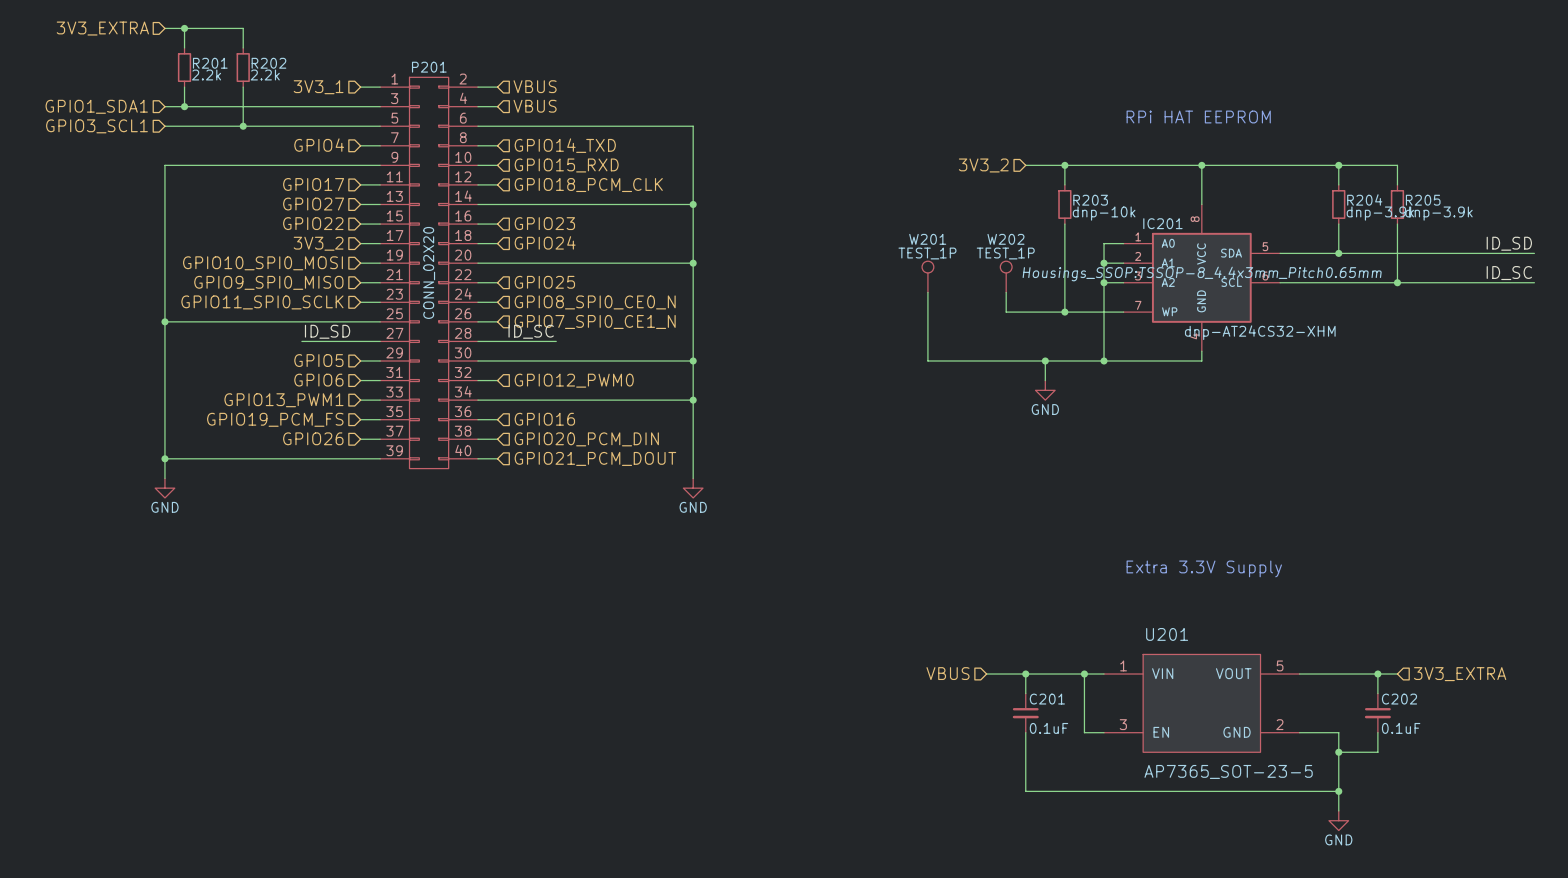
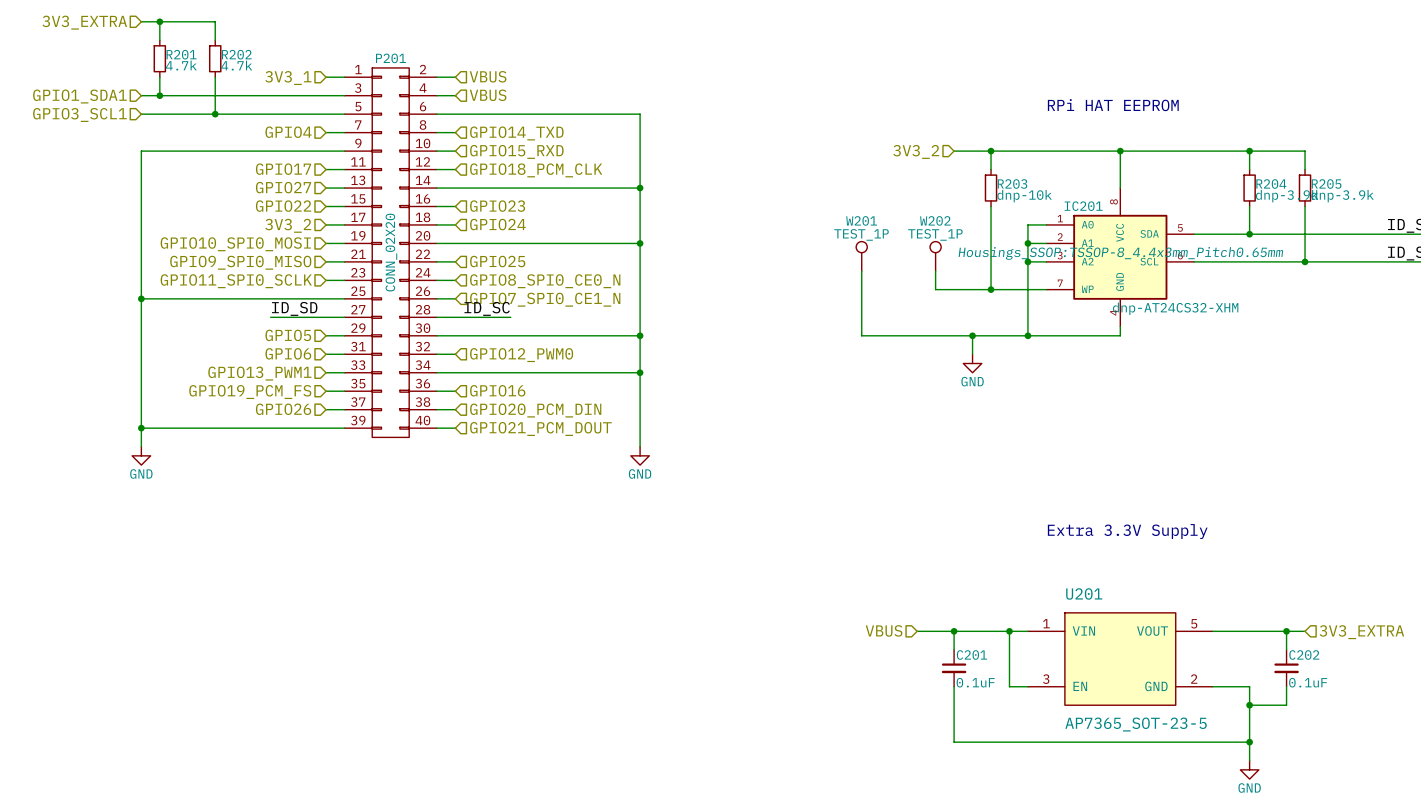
R201 value: 2.2k (206, 75) -> 4.7k (181, 65)
R202 value: 2.2k (265, 75) -> 4.7k (236, 65)

